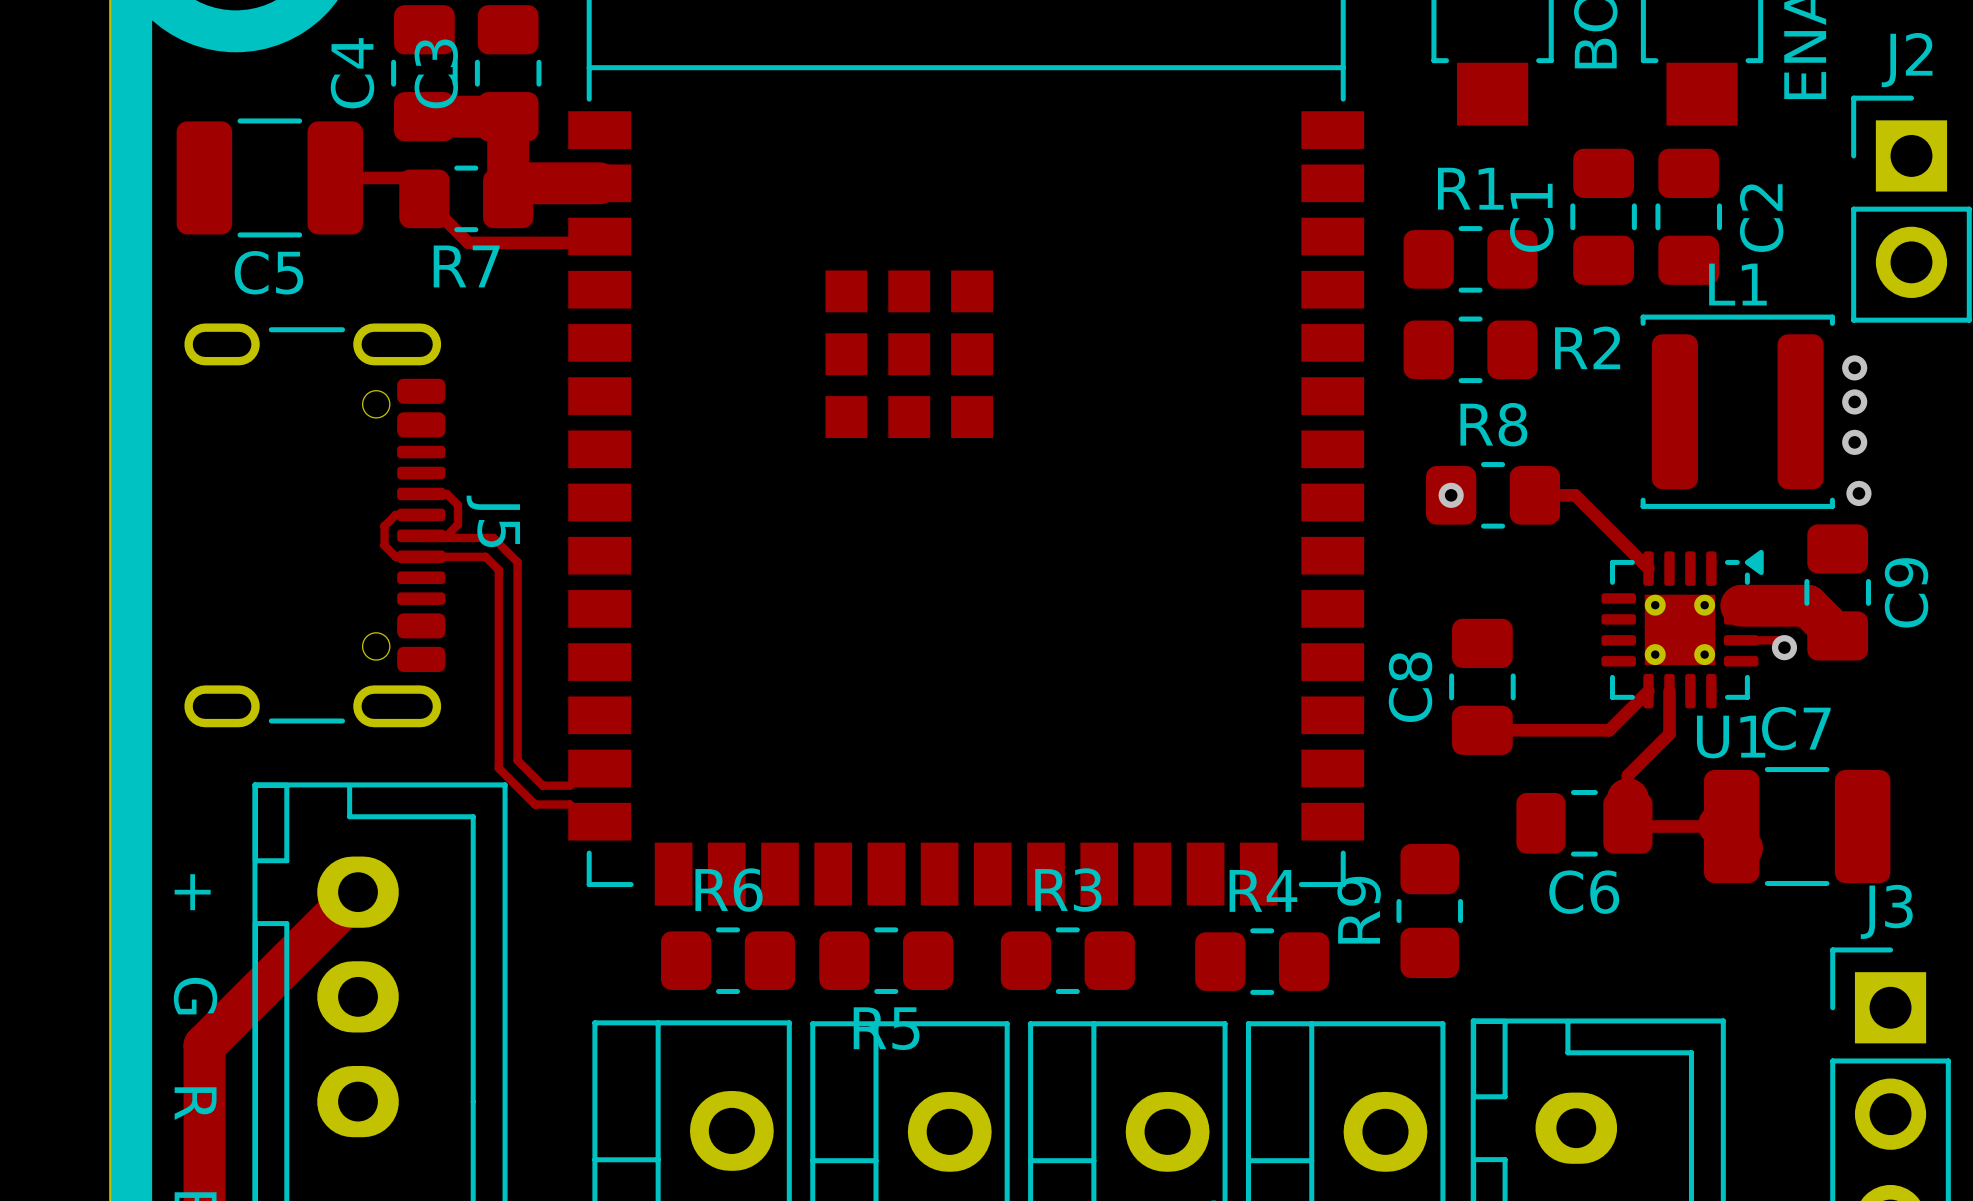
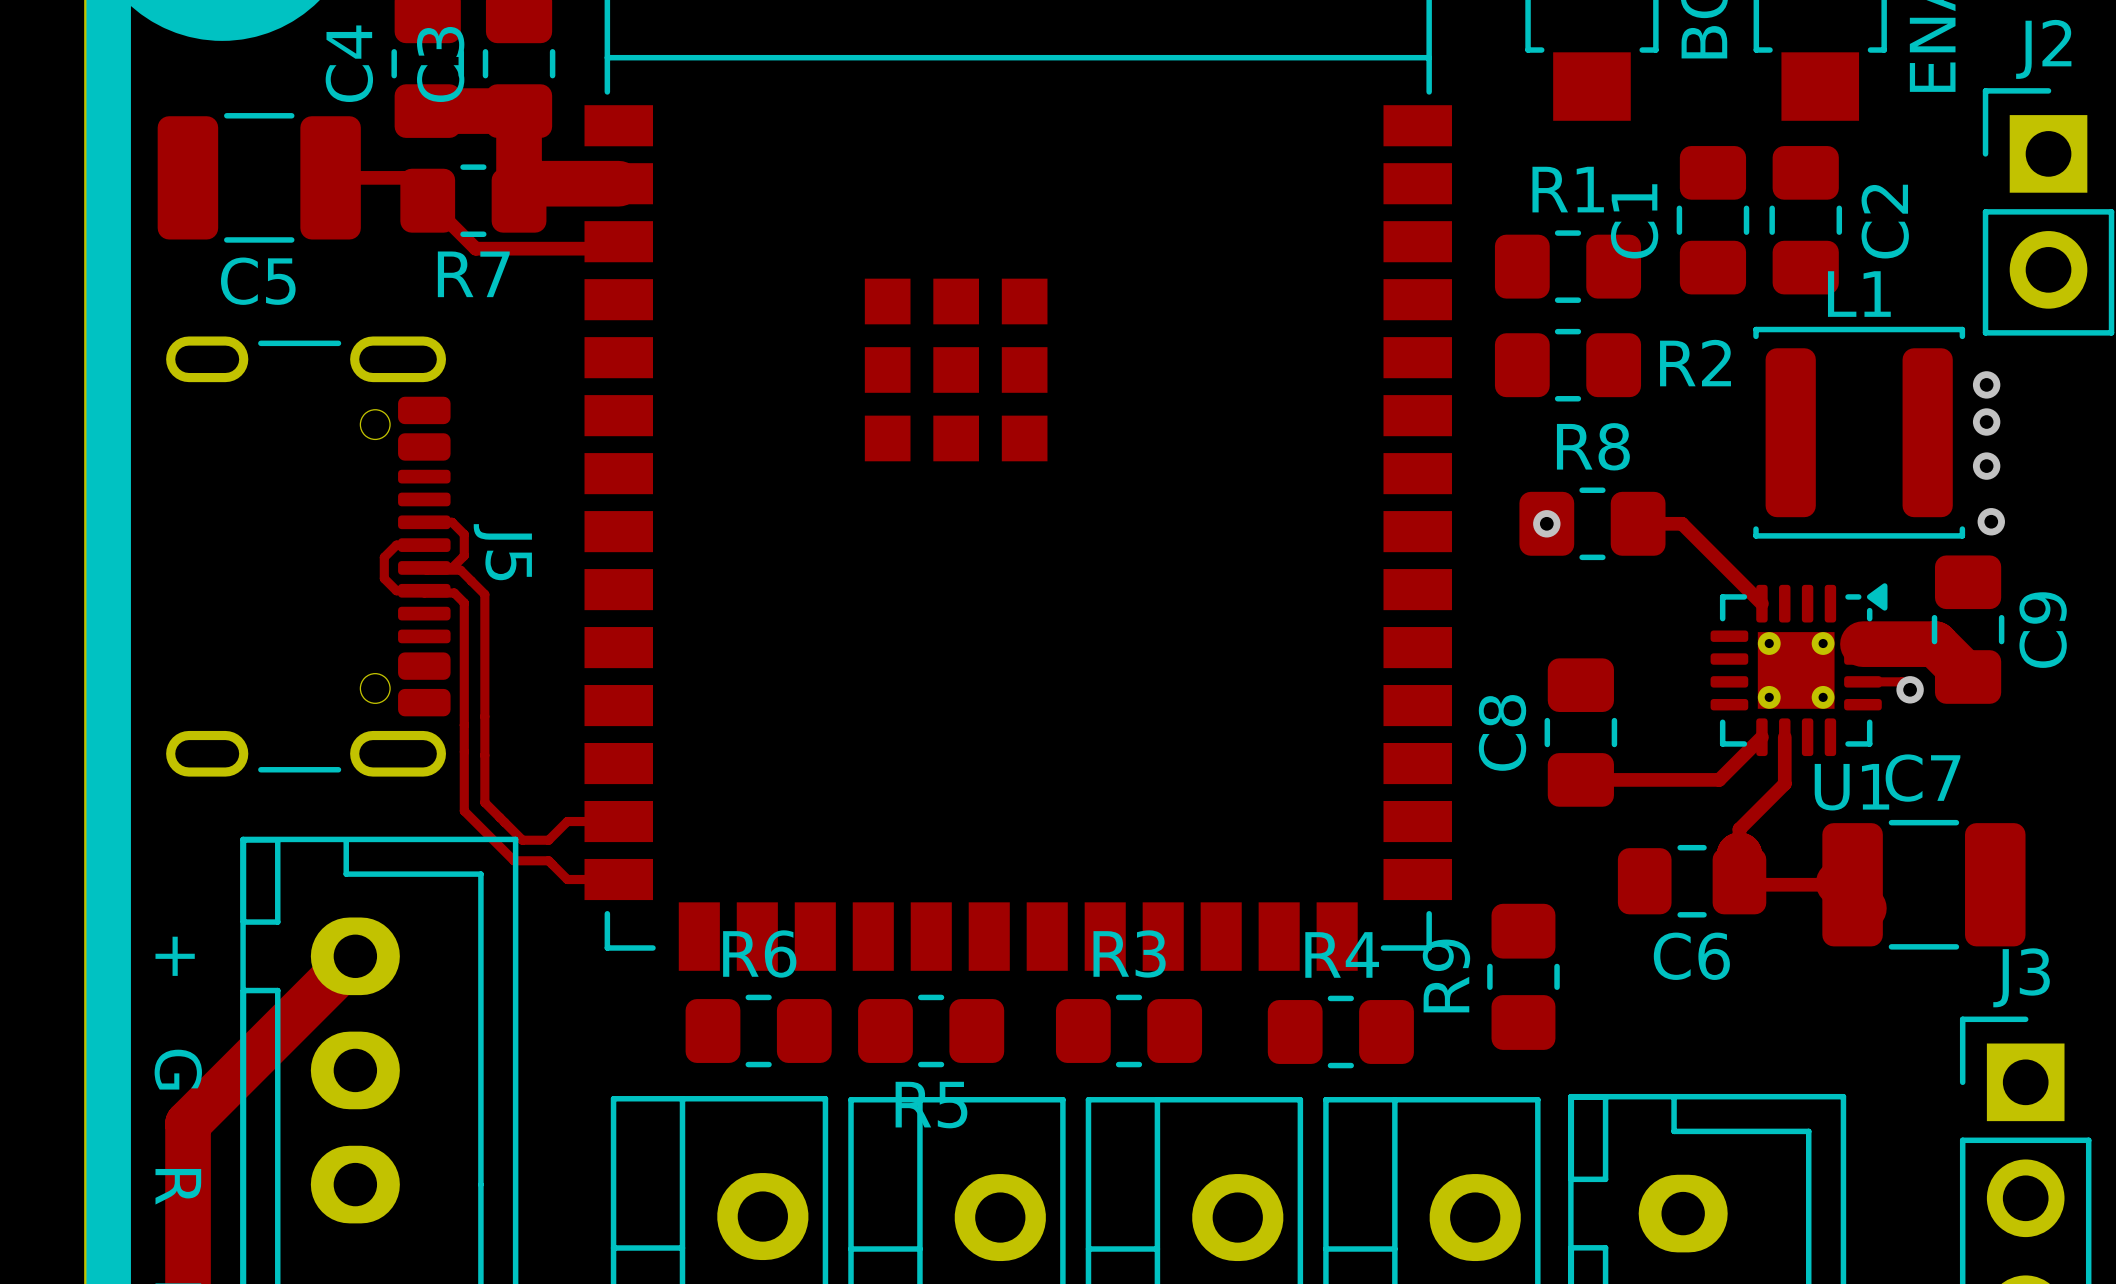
track: (454, 537) (493, 537) (517, 562) (517, 760) (542, 785) (569, 785) (587, 768) -> (460, 570) (484, 594) (484, 802) (522, 840) (548, 840) (567, 821) (605, 821)
track: (421, 556) (485, 556) (498, 569) (498, 768) (534, 804) -> (424, 593) (454, 593) (464, 602) (464, 811) (514, 860) (548, 860)
track: (535, 804) (569, 804) (587, 821) -> (548, 860) (567, 879) (605, 879)

